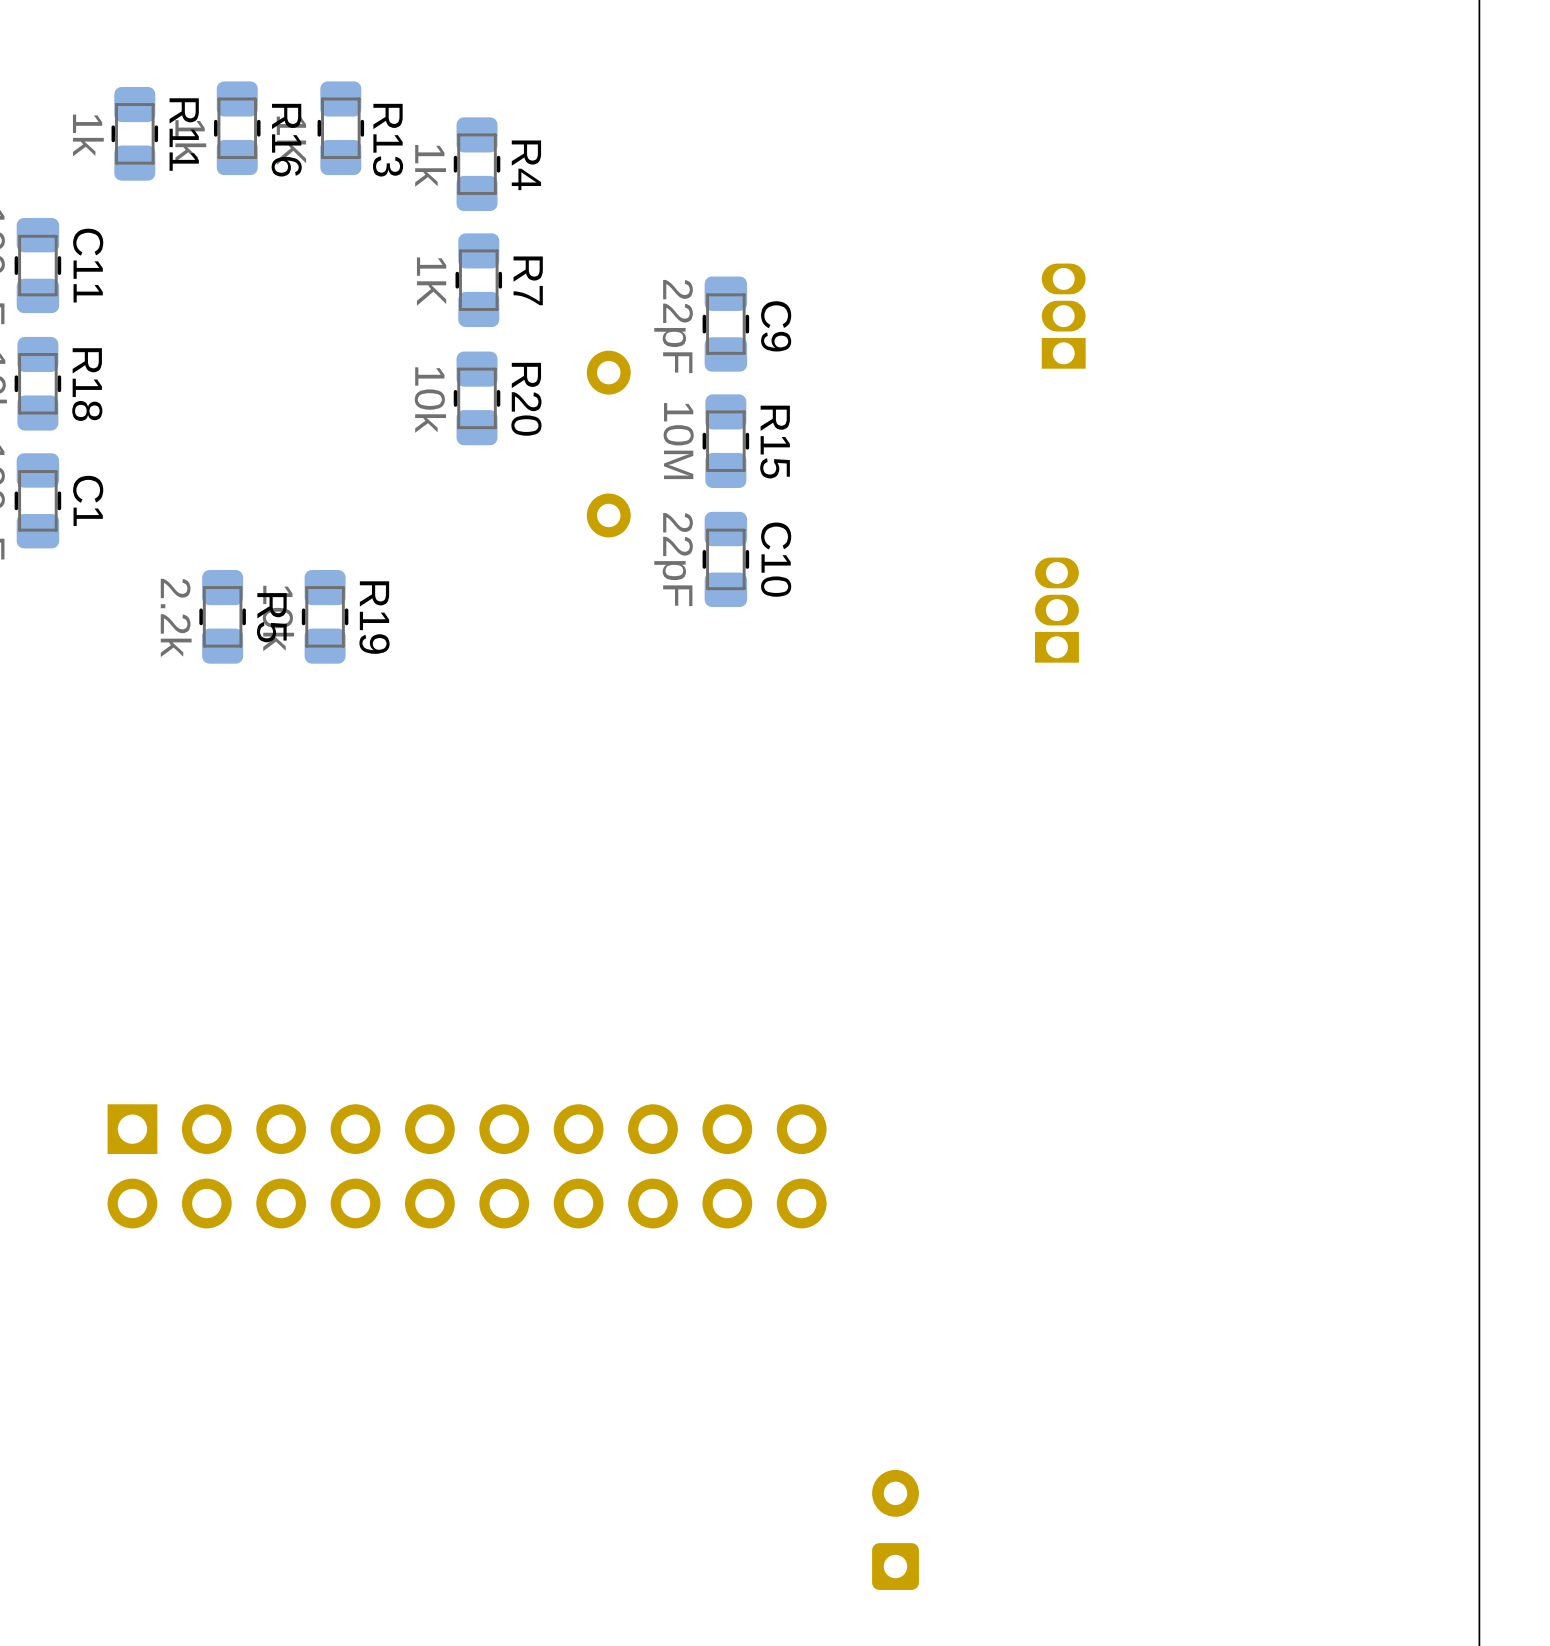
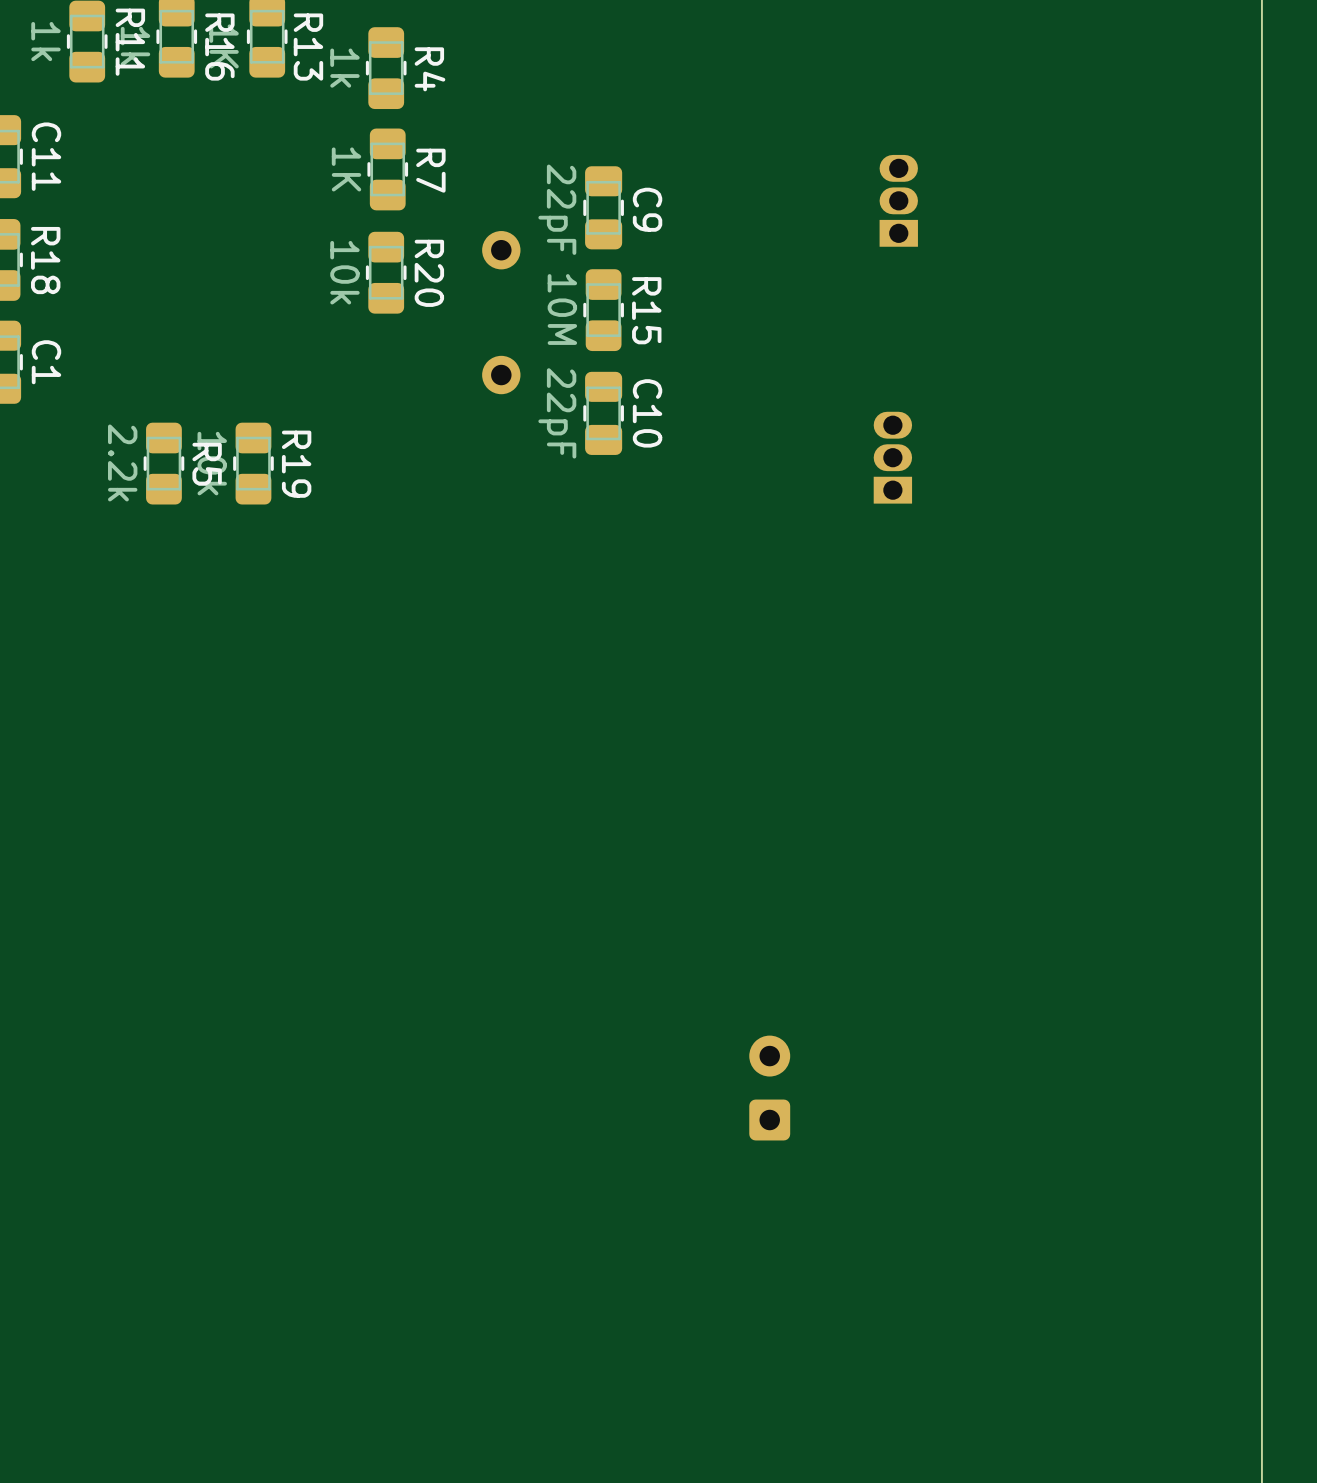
part: (467, 1166) -> none
part position: (895, 1529) -> (769, 1088)

